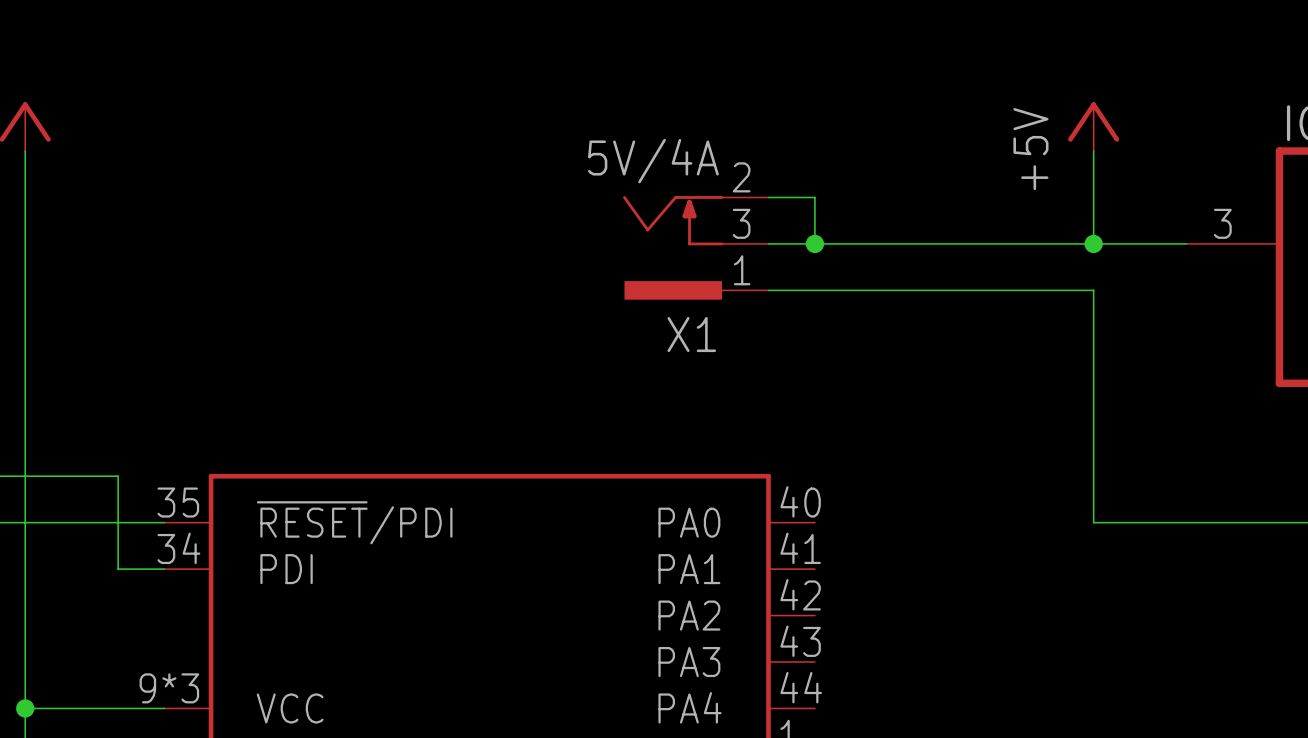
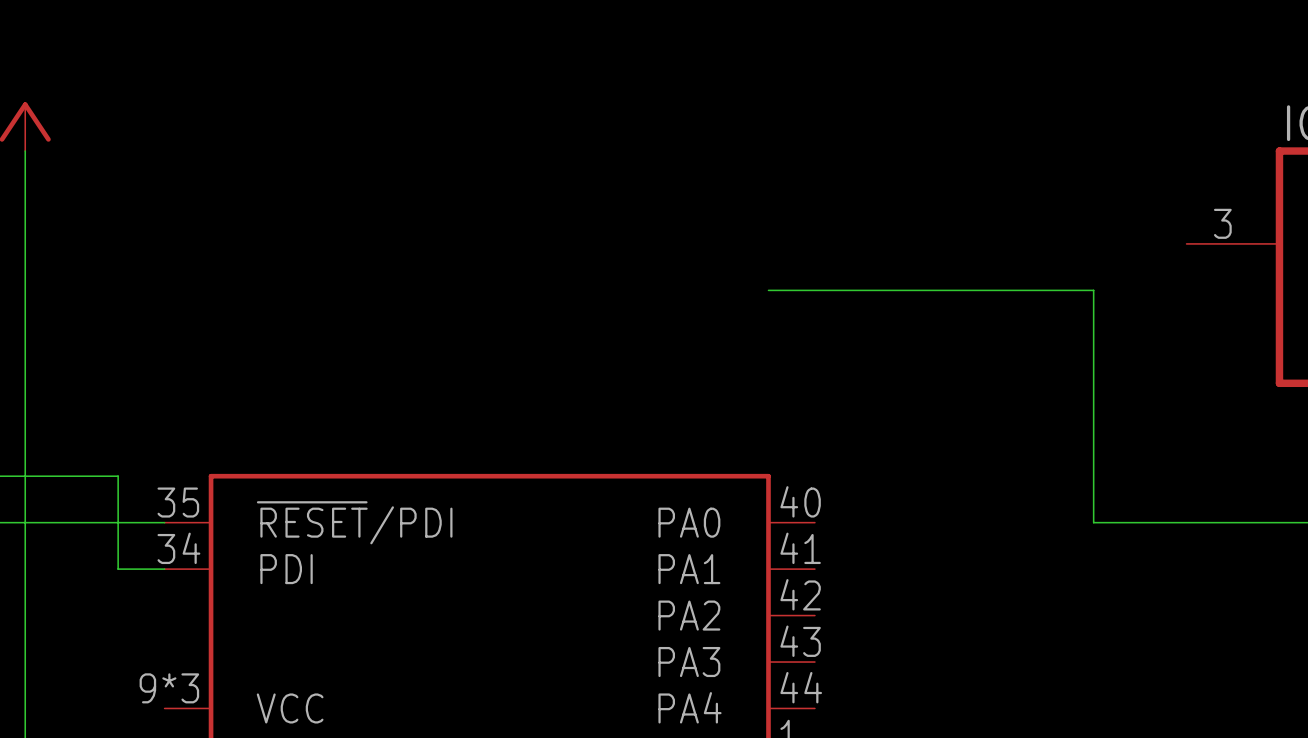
power symbol: +5V (1093, 126) -> none
wire: (1093, 151) (1093, 243) -> none
wire: (768, 197) (814, 197) (814, 243) -> none
wire: (768, 243) (1186, 243) -> none
junction: (814, 243) -> none
junction: (1093, 243) -> none
X1: 5V/4A (695, 247) -> none
wire: (25, 708) (164, 708) -> none
junction: (25, 708) -> none

